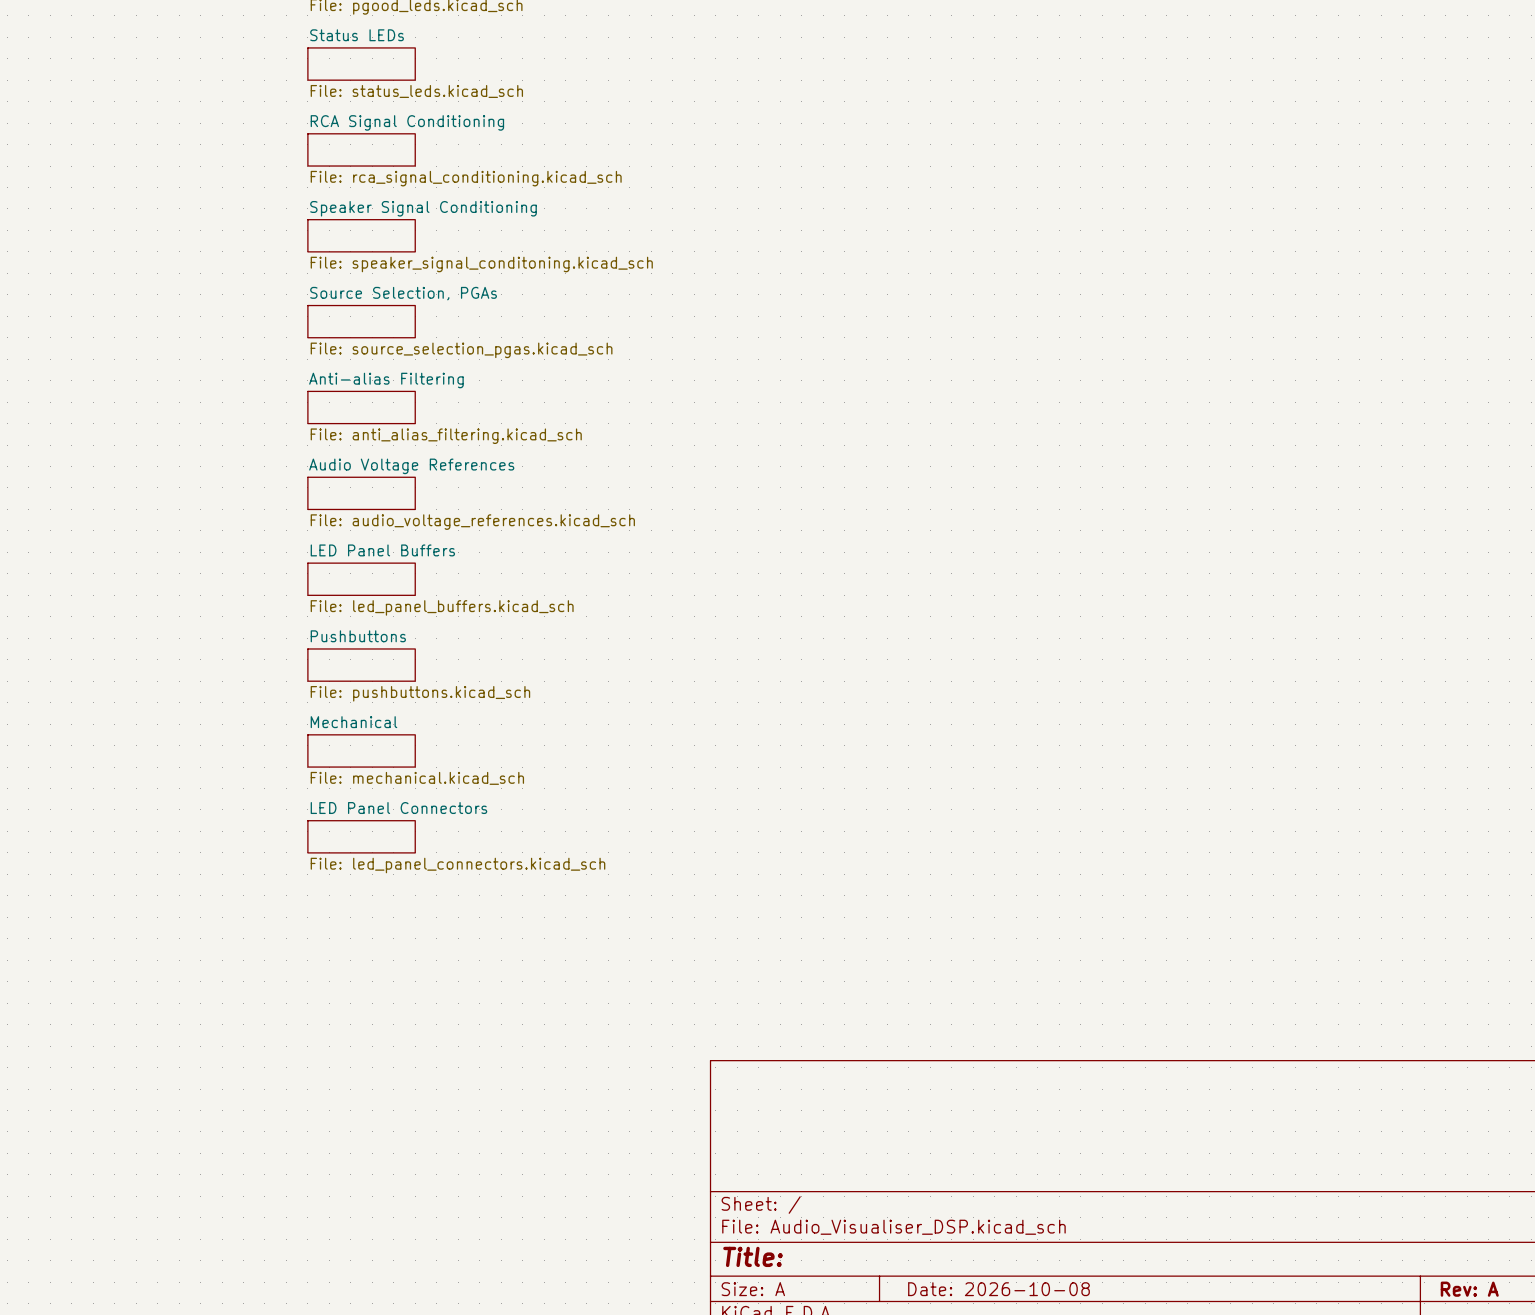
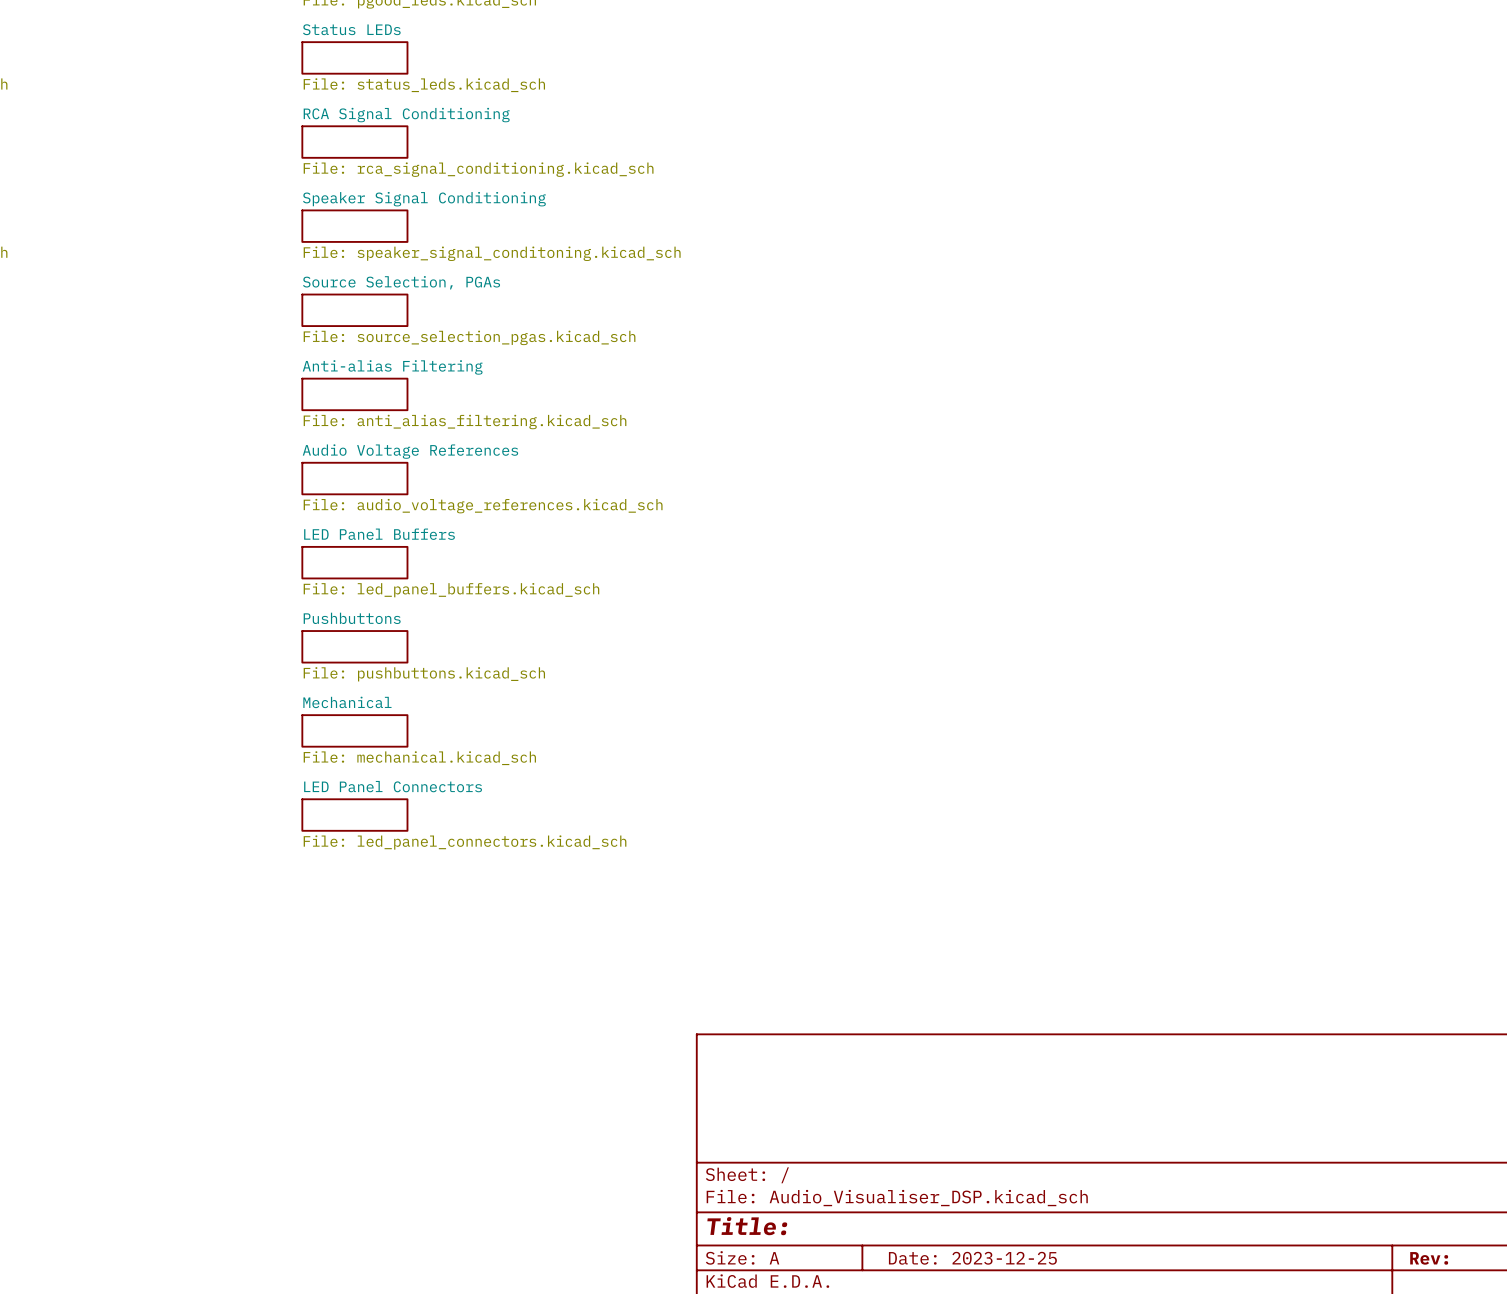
title block: Date: 2026-10-08 (999, 1289) -> Date: 2023-12-25 (972, 1258)
title block: Rev: A (1469, 1289) -> Rev: (1429, 1258)

